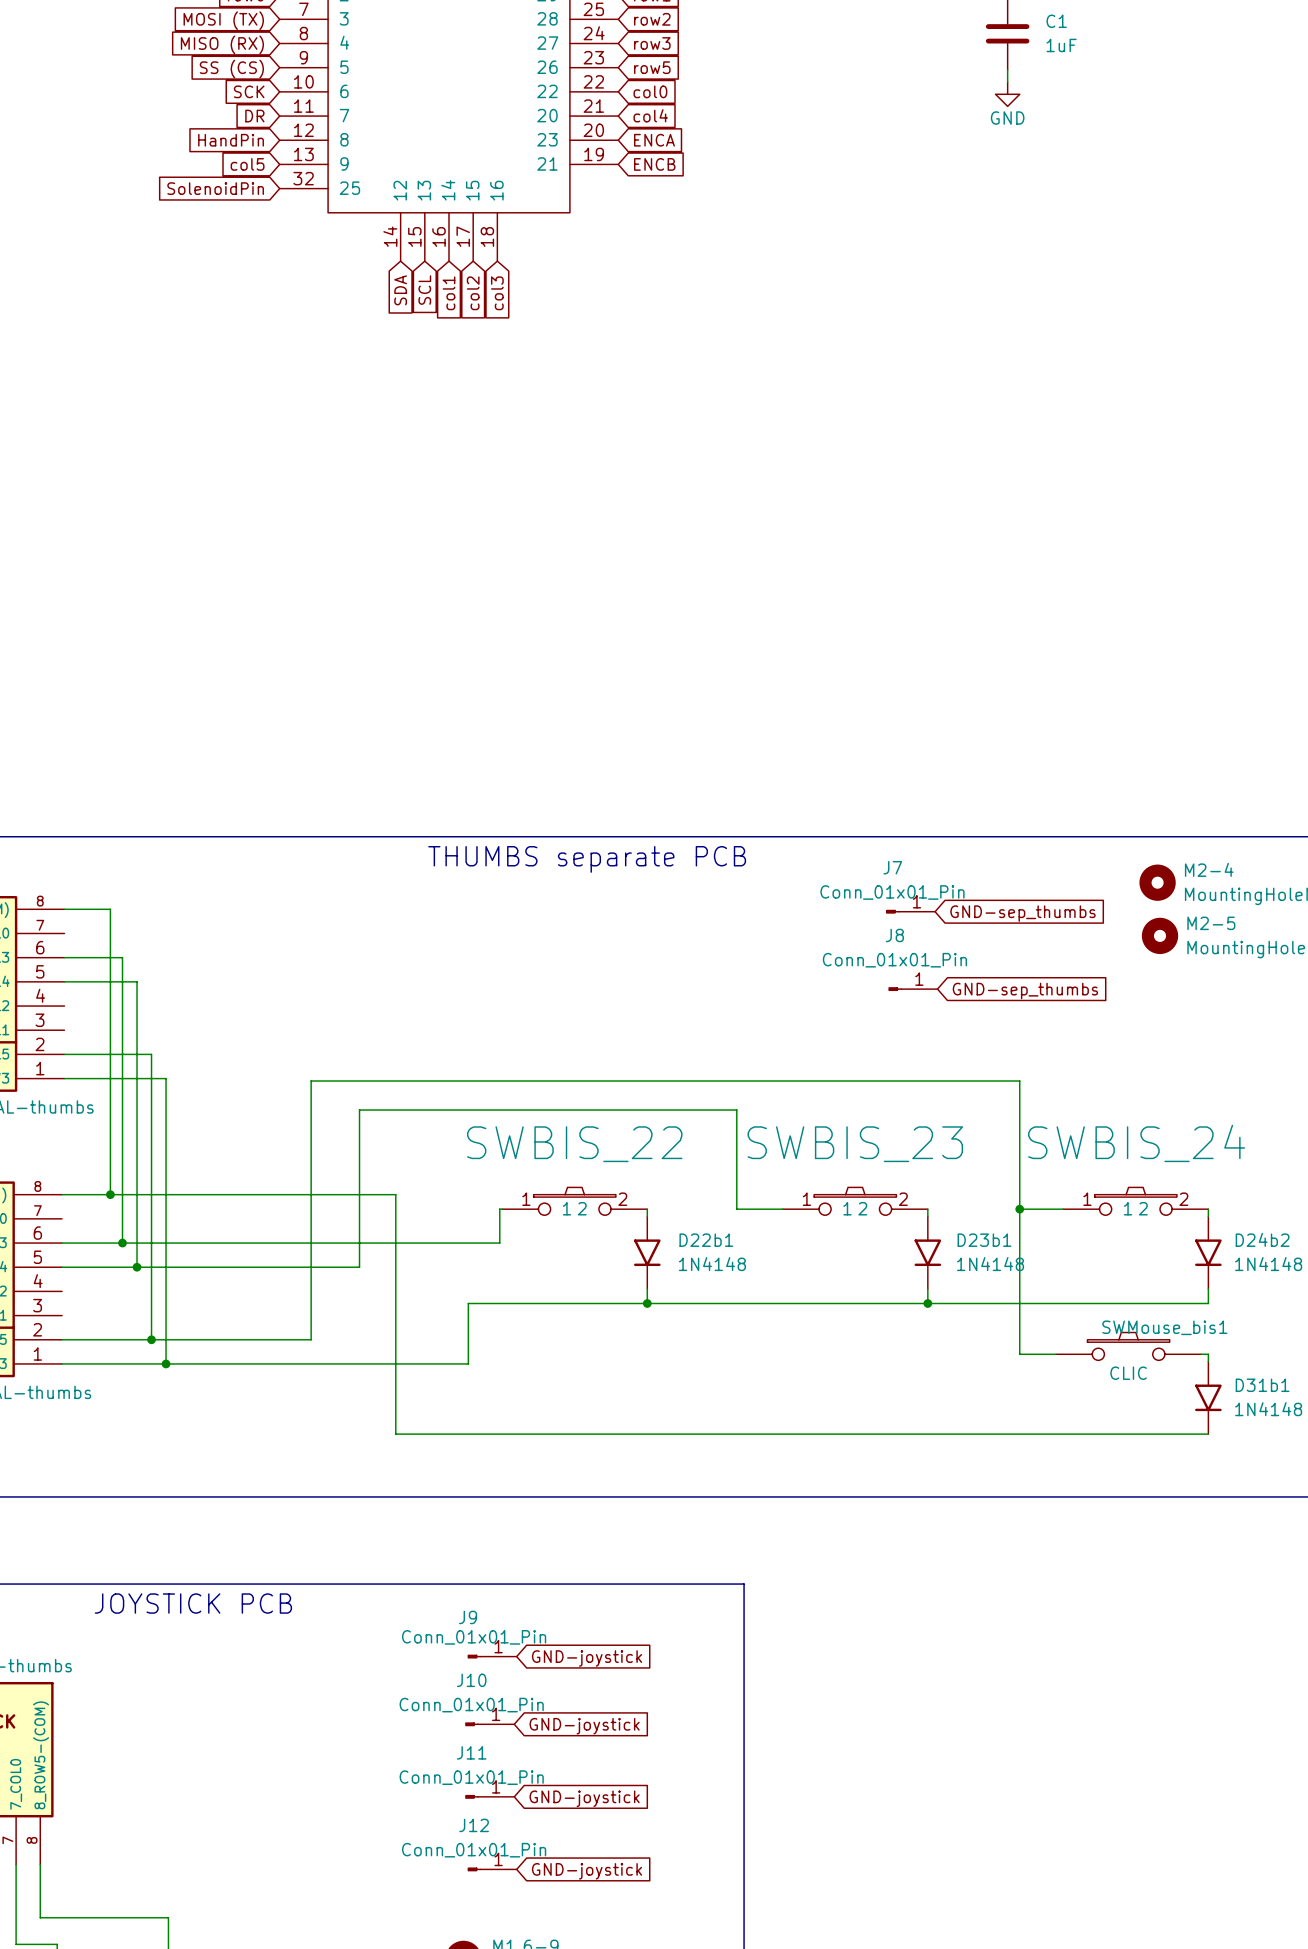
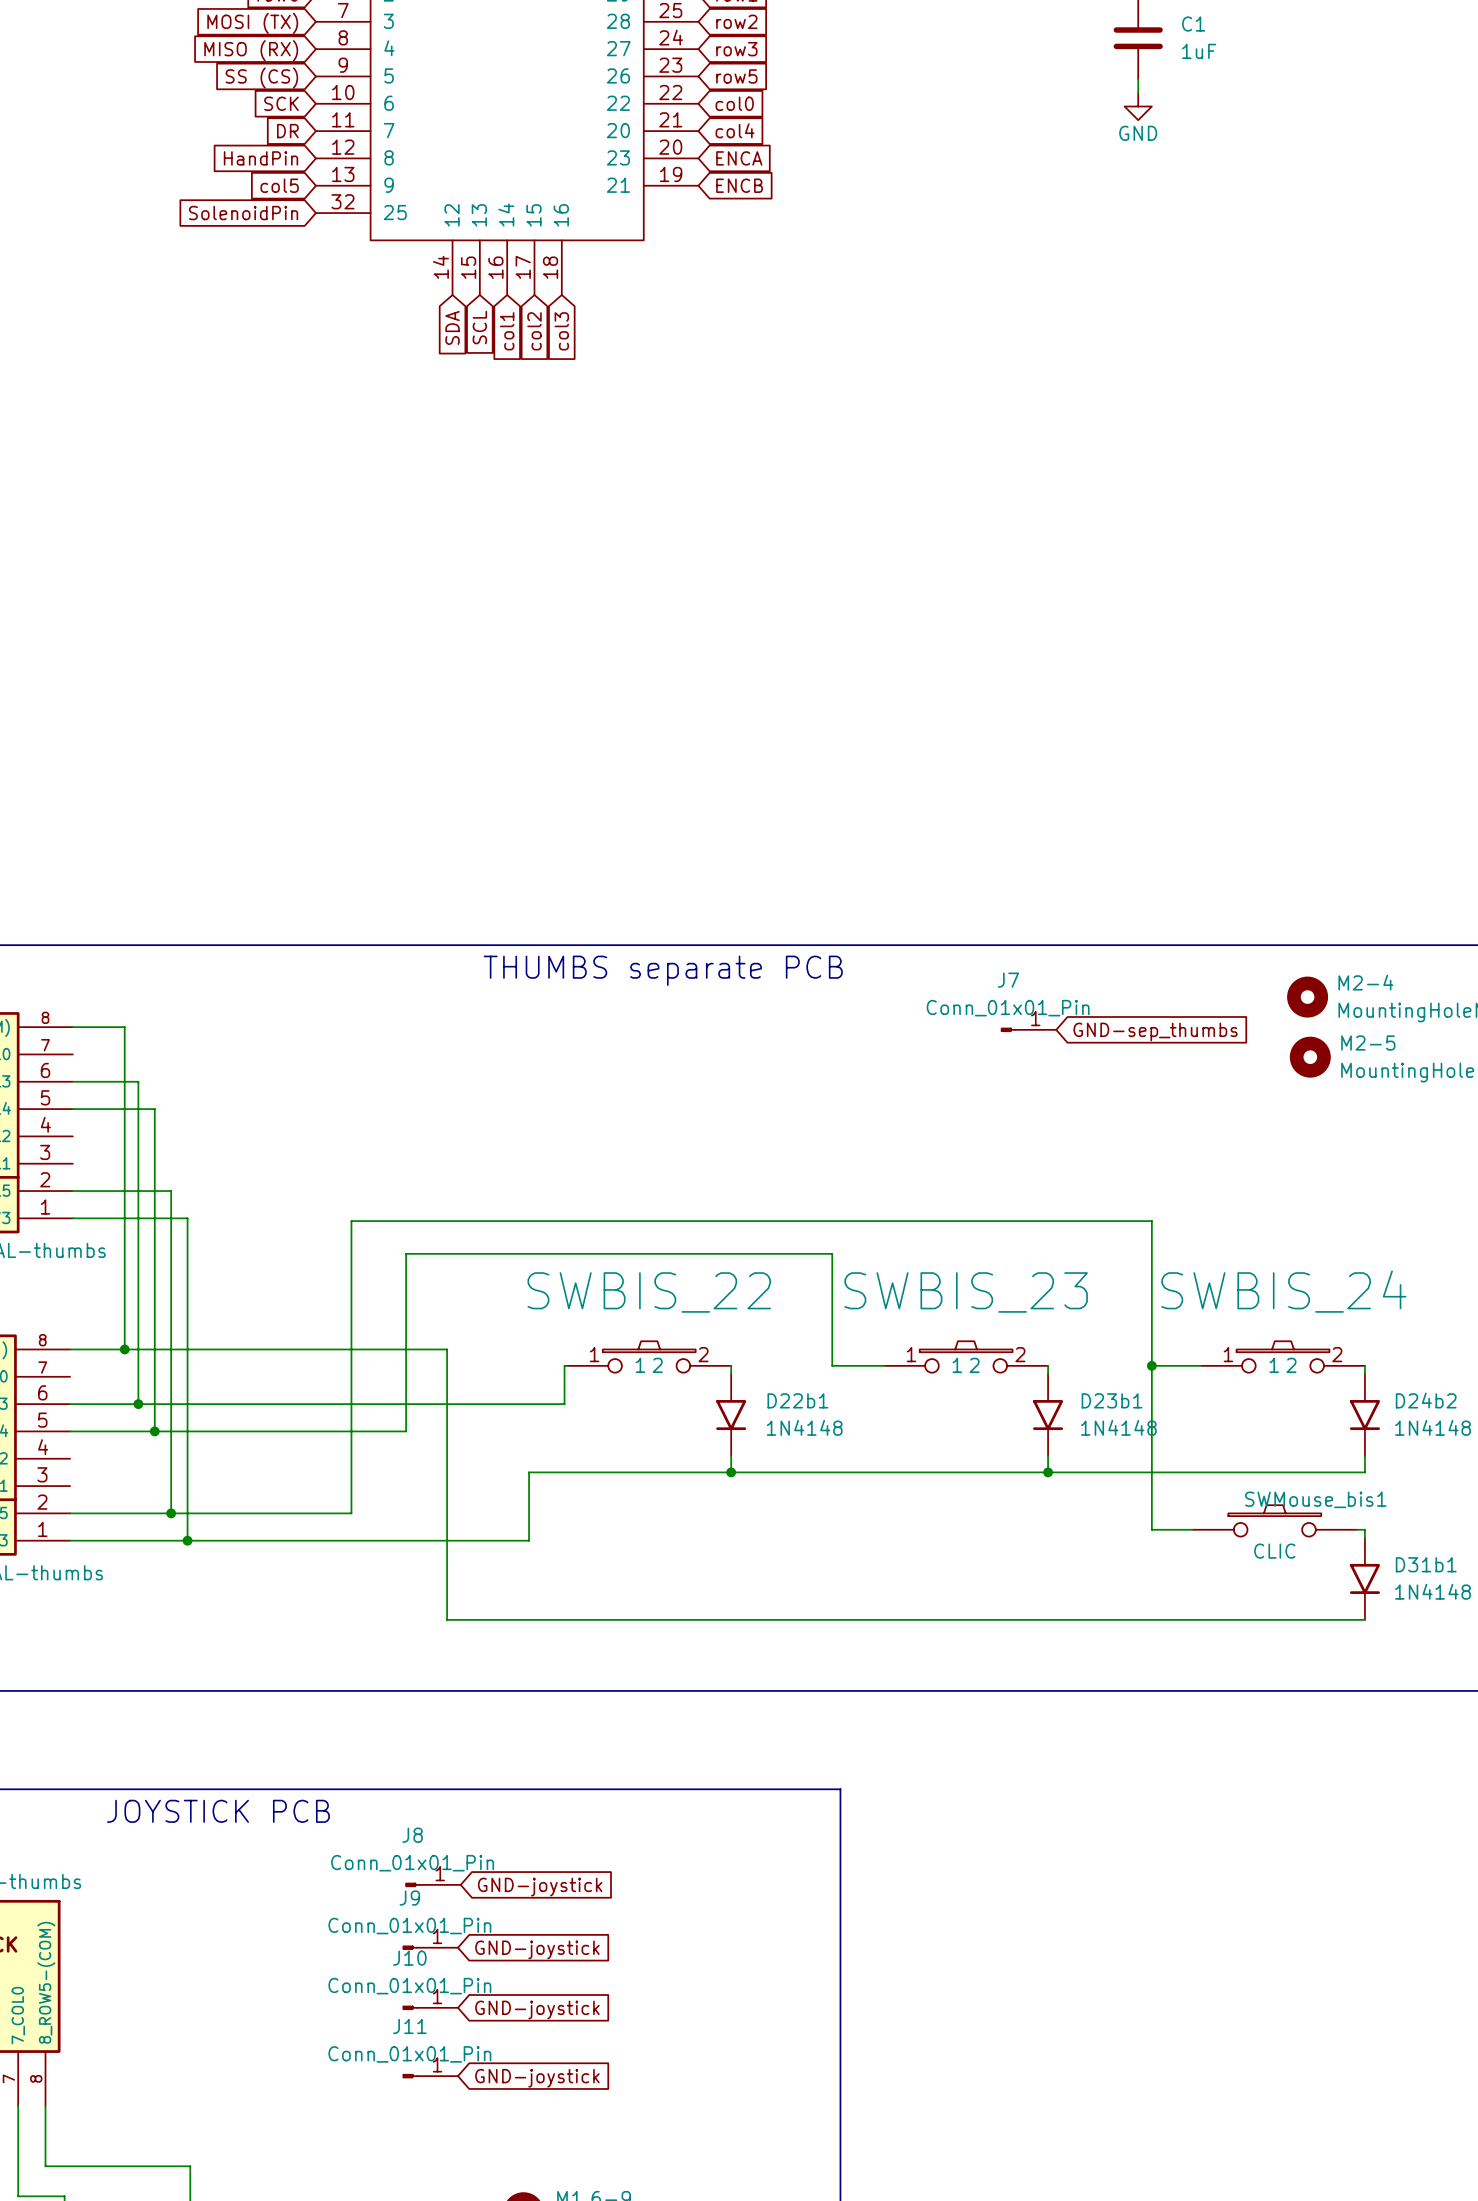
J8 name position: J8 (894, 935) -> J8 (412, 1835)
J8 value position: Conn_01x01_Pin (894, 960) -> Conn_01x01_Pin (412, 1863)
J8 position: (912, 989) -> (433, 1884)
global label: GND-sep_thumbs (1025, 991) -> none
J9 name position: J9 (468, 1617) -> J9 (409, 1898)
J9 position: (492, 1656) -> (430, 1947)
global label position: GND-joystick (587, 1658) -> GND-joystick (540, 1887)
J10 position: (489, 1724) -> (430, 2007)
global label position: GND-joystick (584, 1726) -> GND-joystick (537, 1949)
J11 position: (489, 1796) -> (430, 2076)
global label position: GND-joystick (584, 1798) -> GND-joystick (537, 2009)
global label: none -> GND-joystick (537, 2078)
J12: Conn_01x01_Pin (492, 1869) -> none
global label: GND-joystick (587, 1871) -> none

